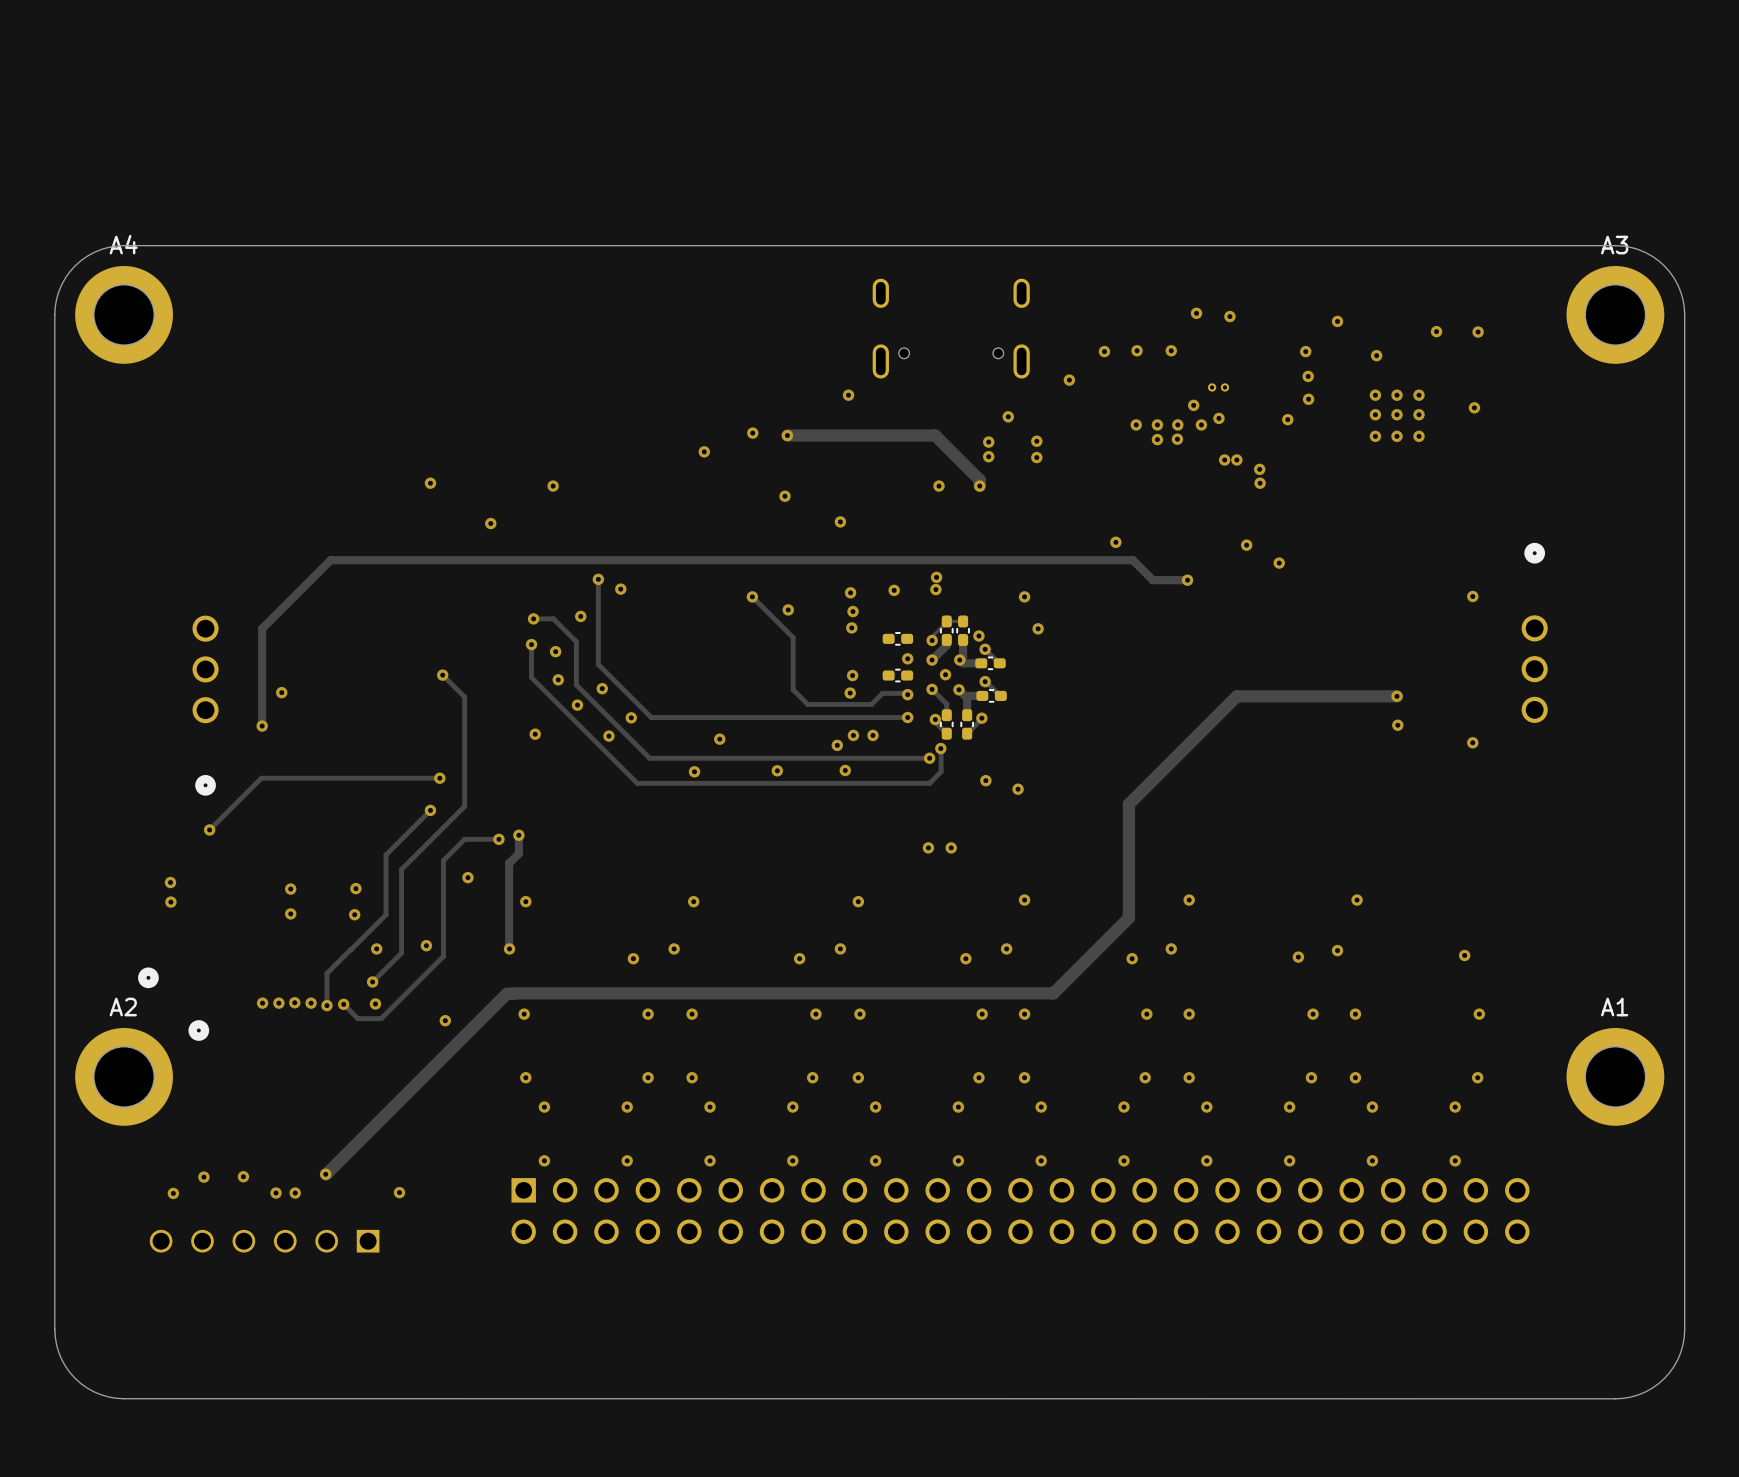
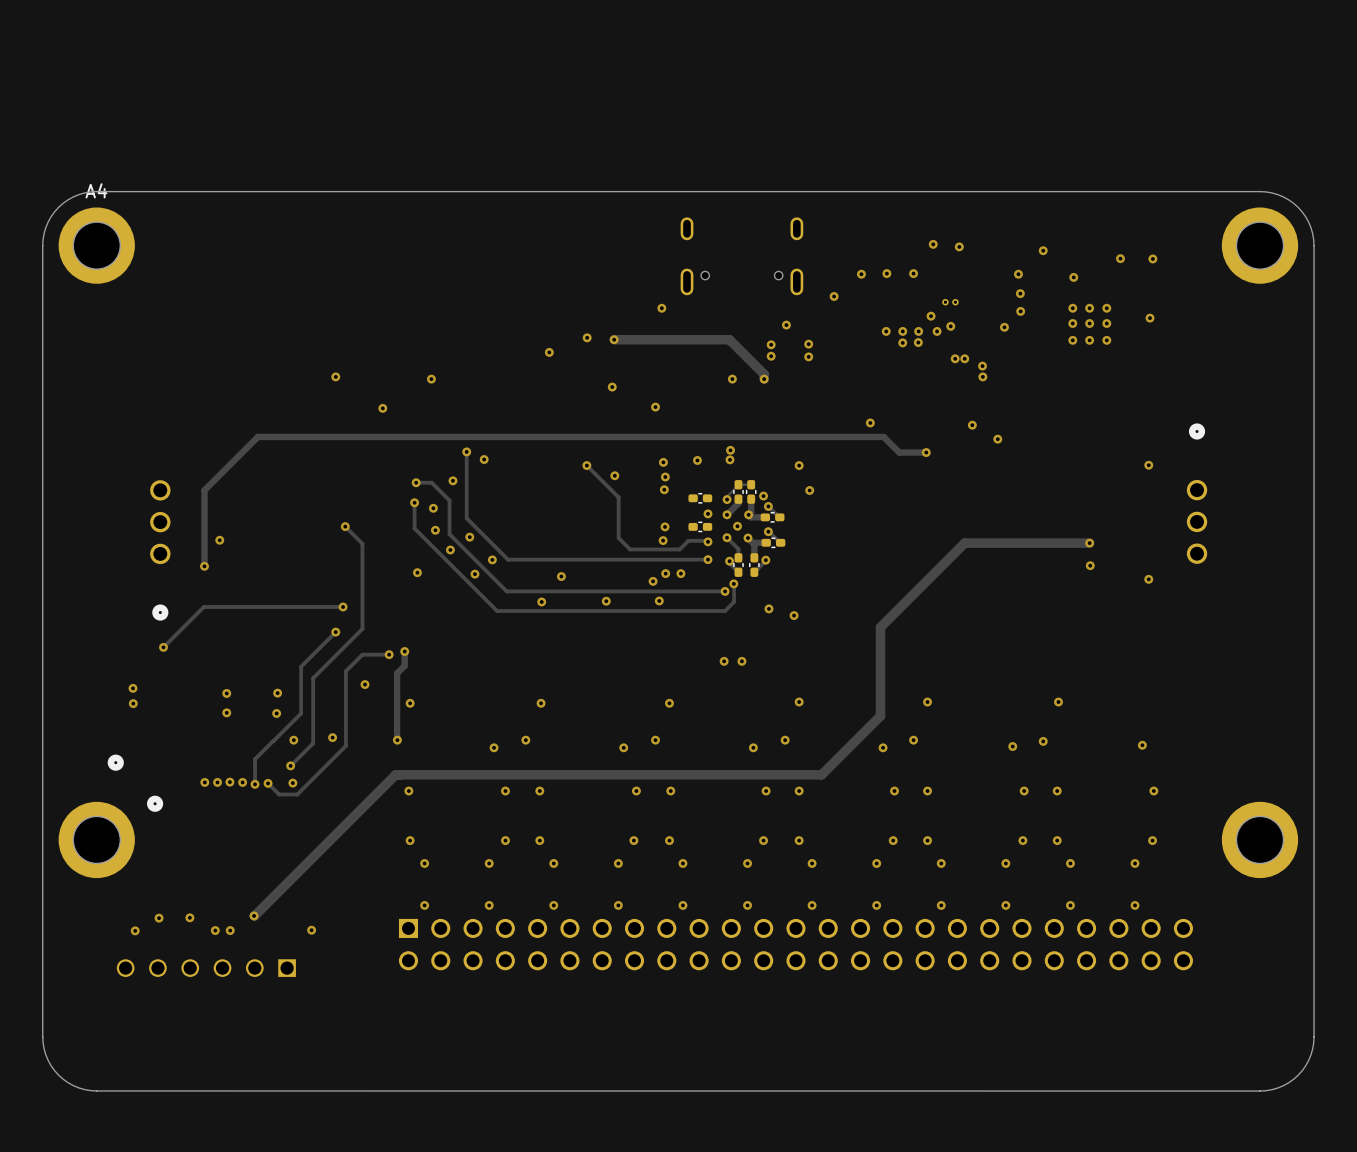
A3 name: A3 (1614, 245) -> none
A2 name: A2 (123, 1007) -> none
A1 name: A1 (1614, 1007) -> none
via: (445, 1020) -> none

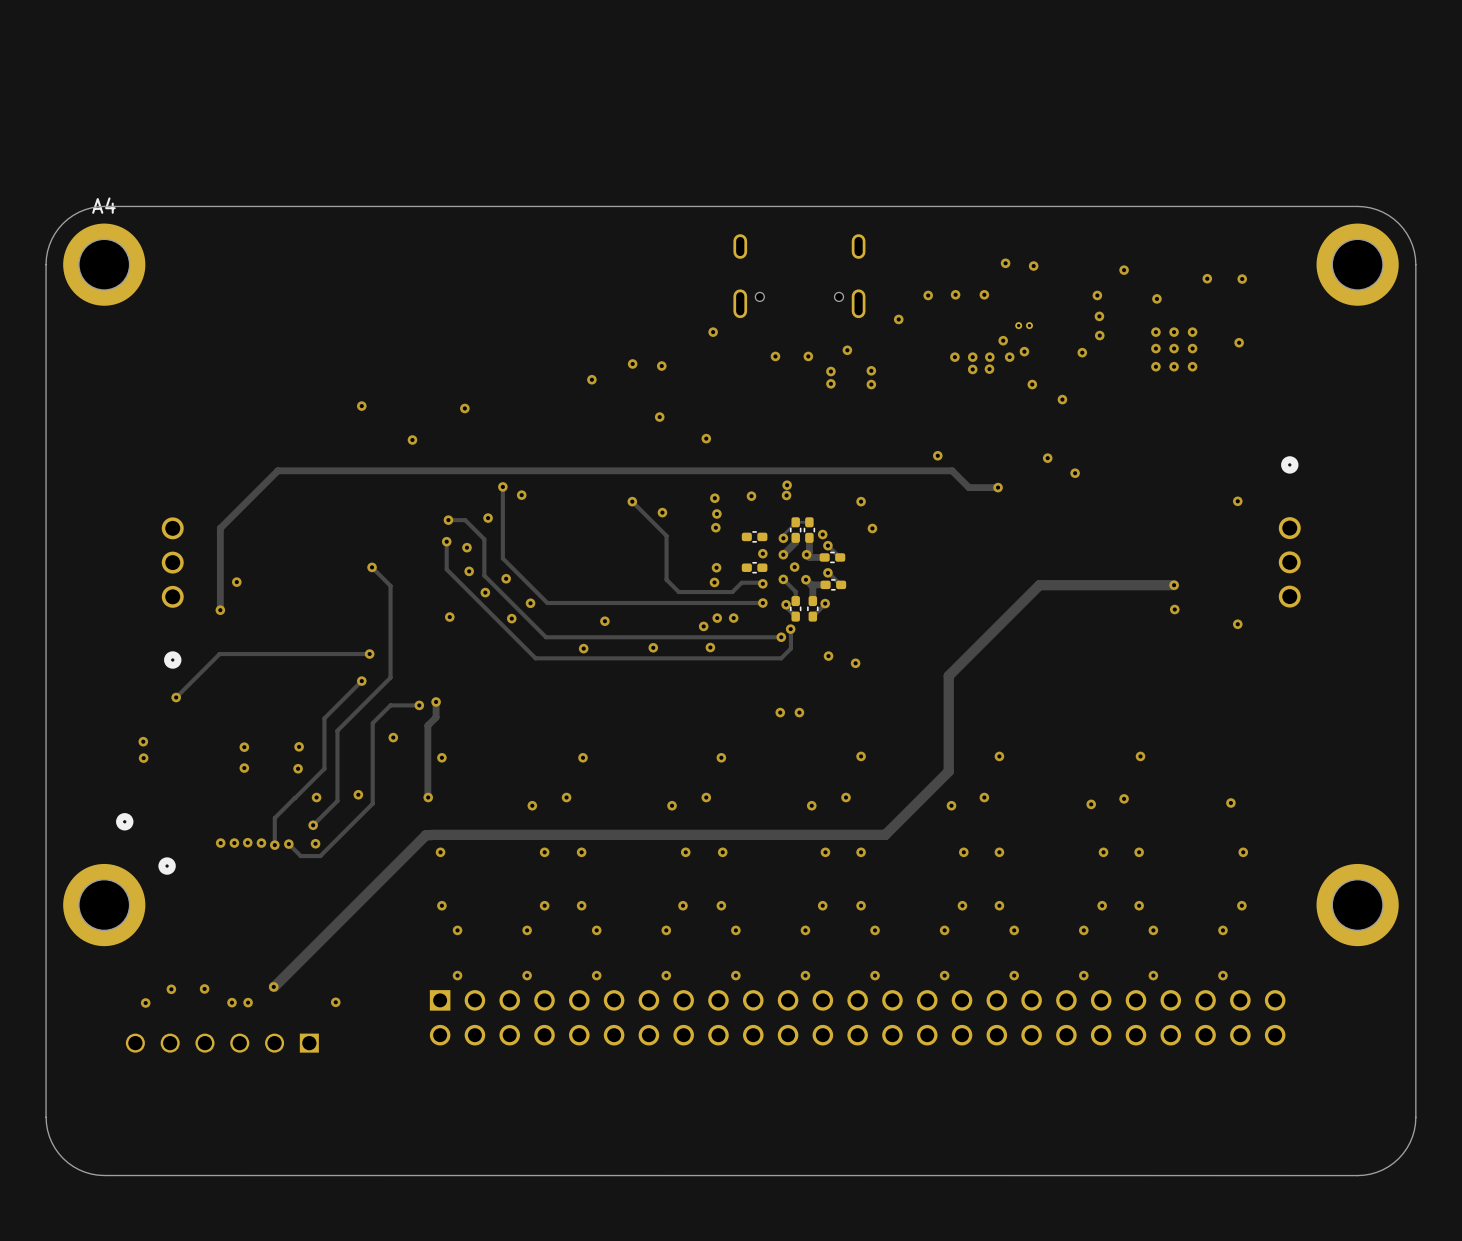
via: none -> (775, 356)
via: none -> (808, 356)
track: (614, 339) (729, 339) (764, 374) (764, 379) -> none
via: none -> (1032, 384)
via: (955, 358) -> none
via: (964, 358) -> none
via: (982, 366) -> none
via: none -> (1062, 399)
via: (982, 376) -> none
via: (732, 379) -> none
via: (764, 379) -> none

